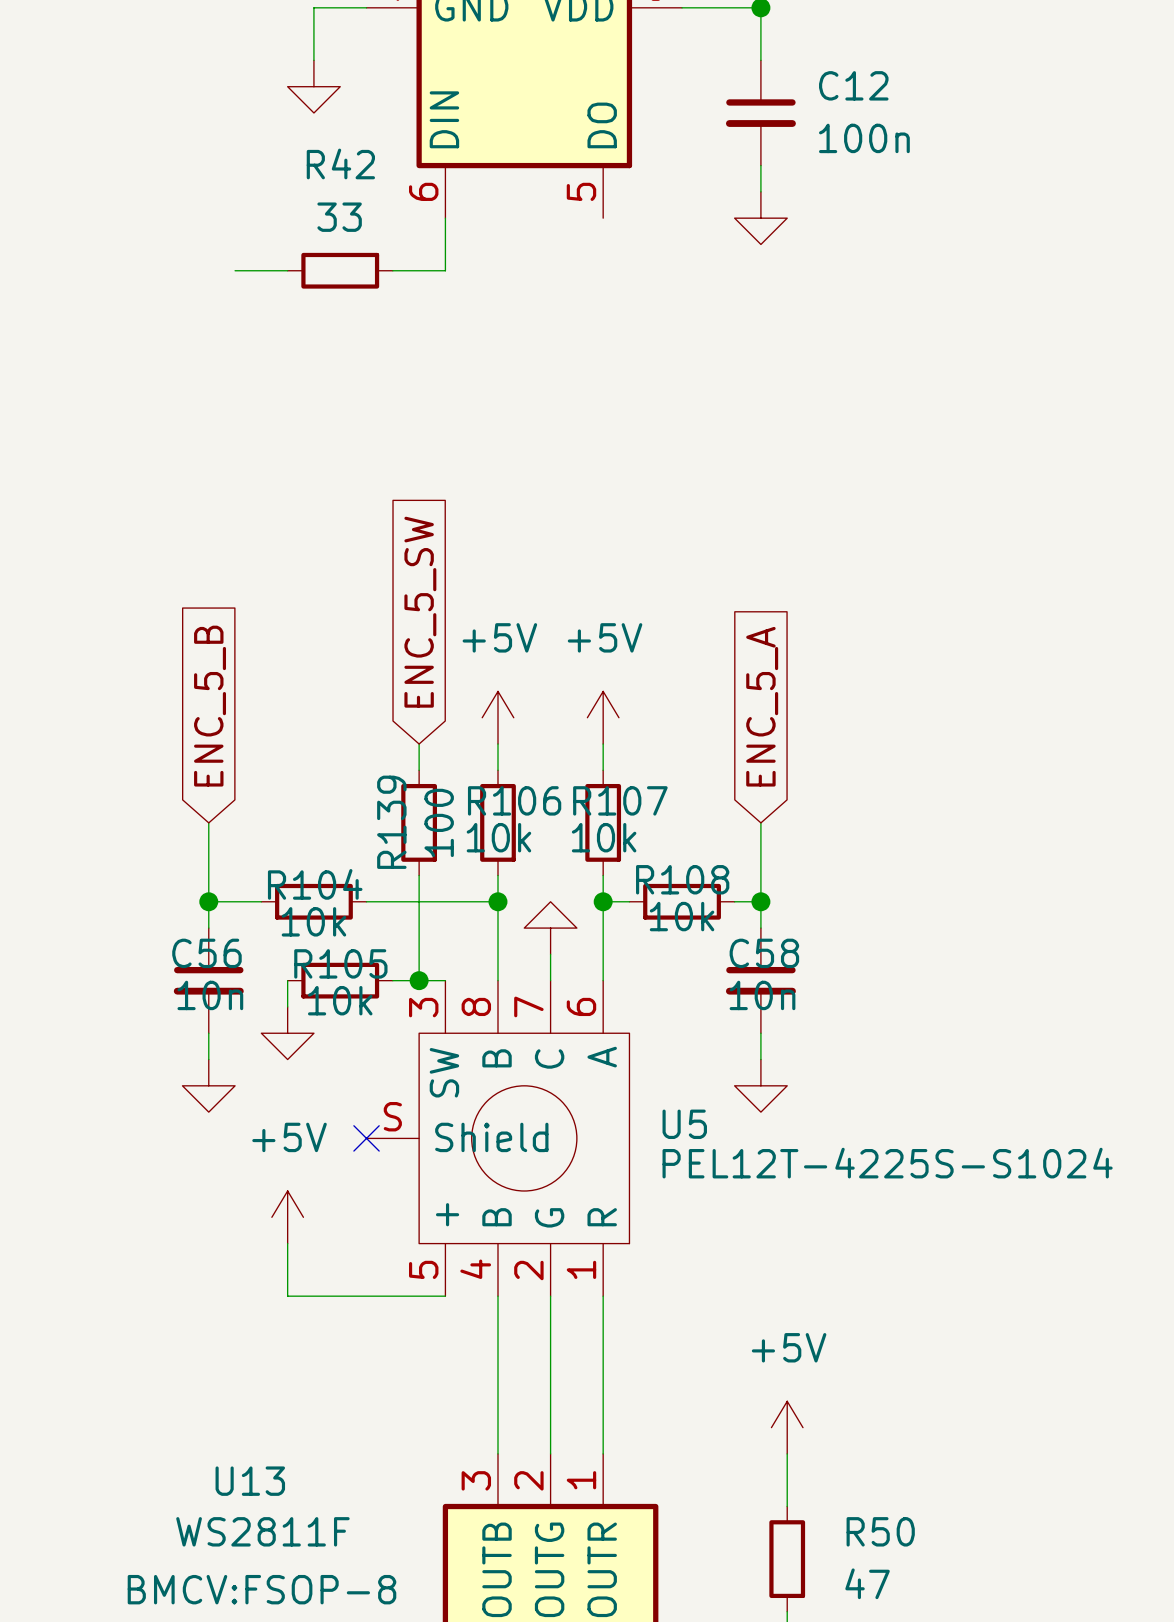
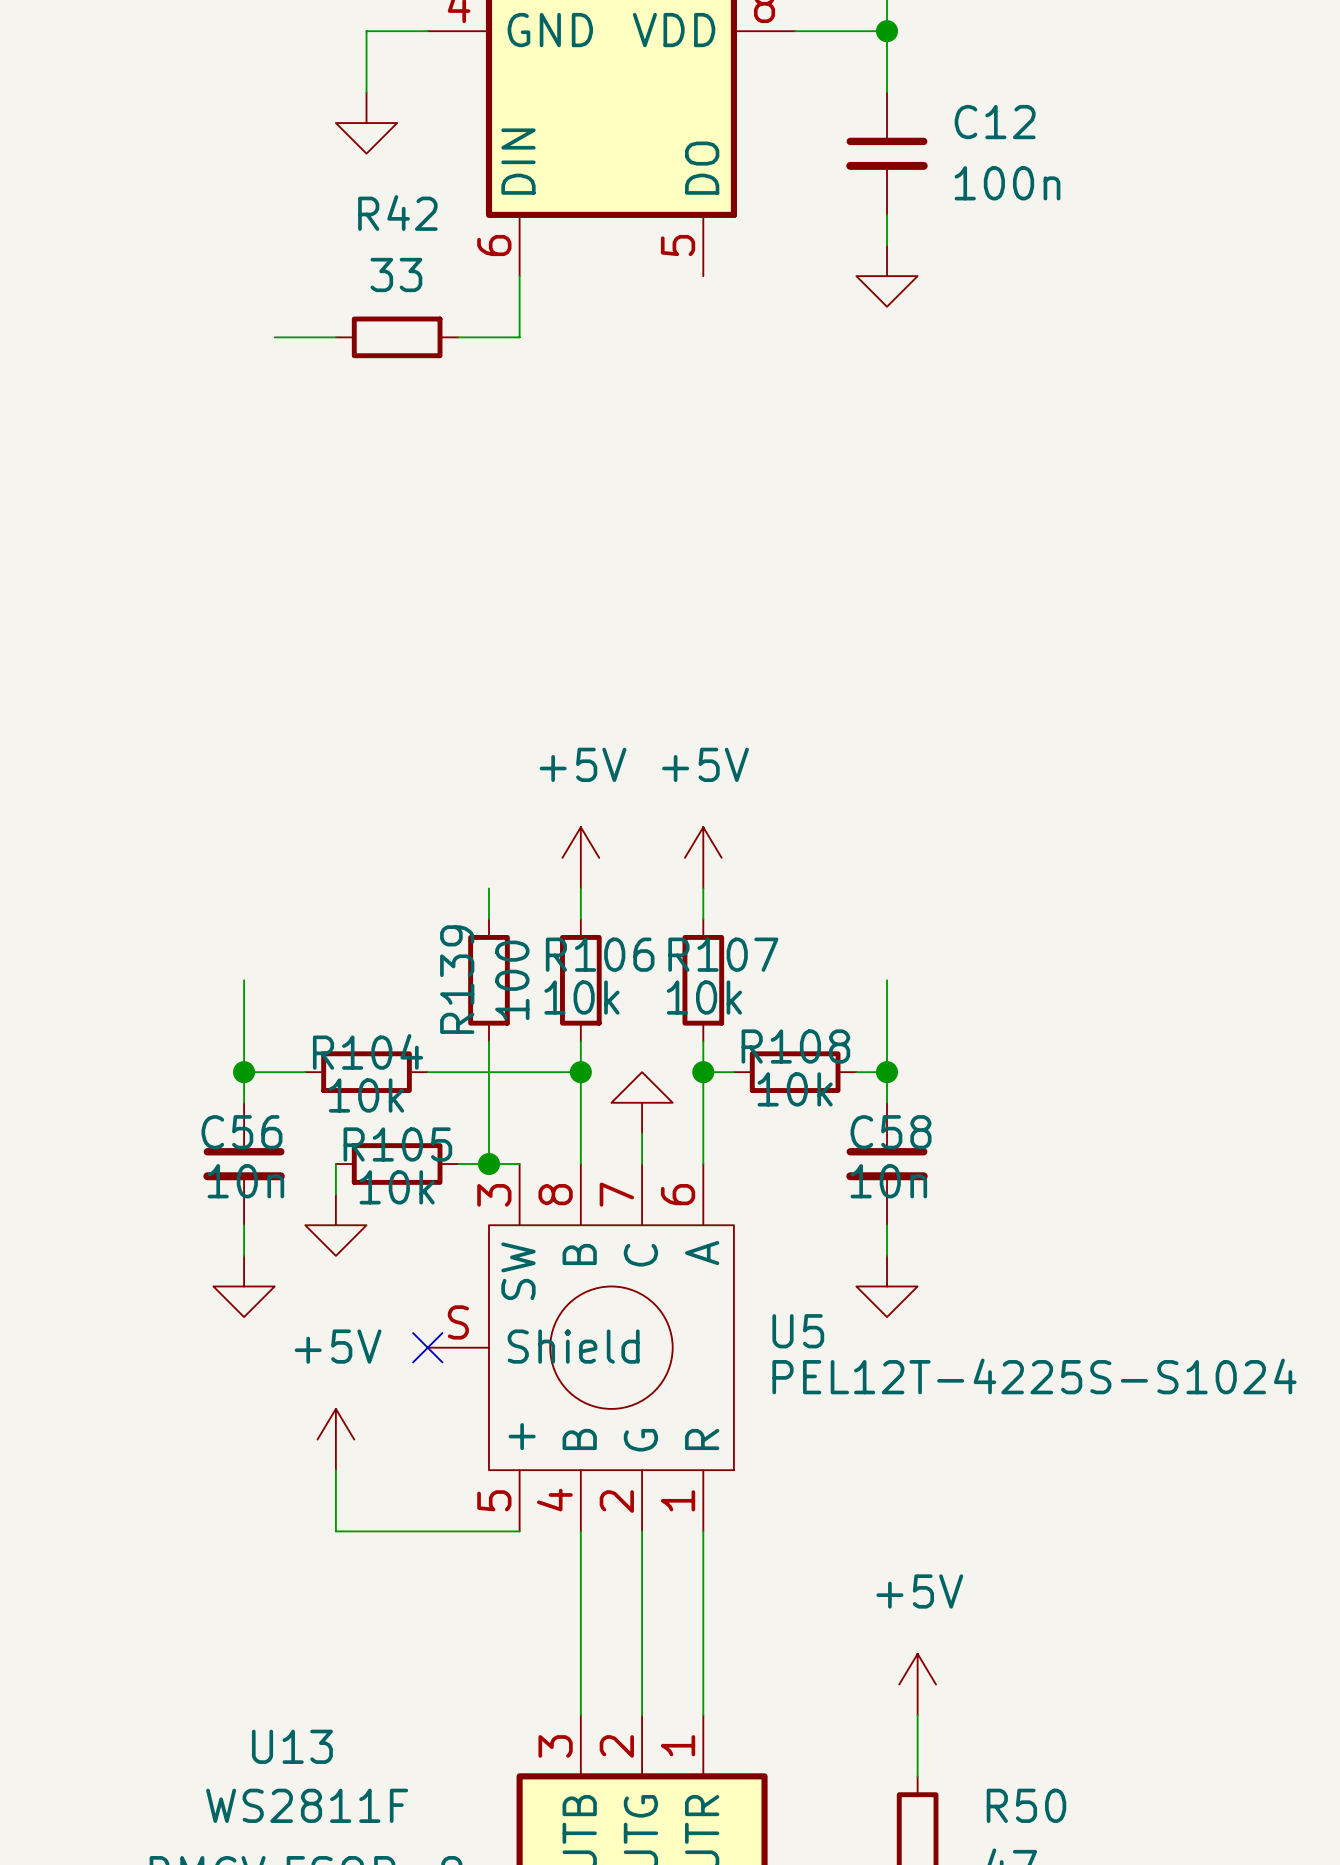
global label: ENC_5_SW (420, 612) -> none
global label: ENC_5_B (210, 706) -> none
global label: ENC_5_A (762, 706) -> none

